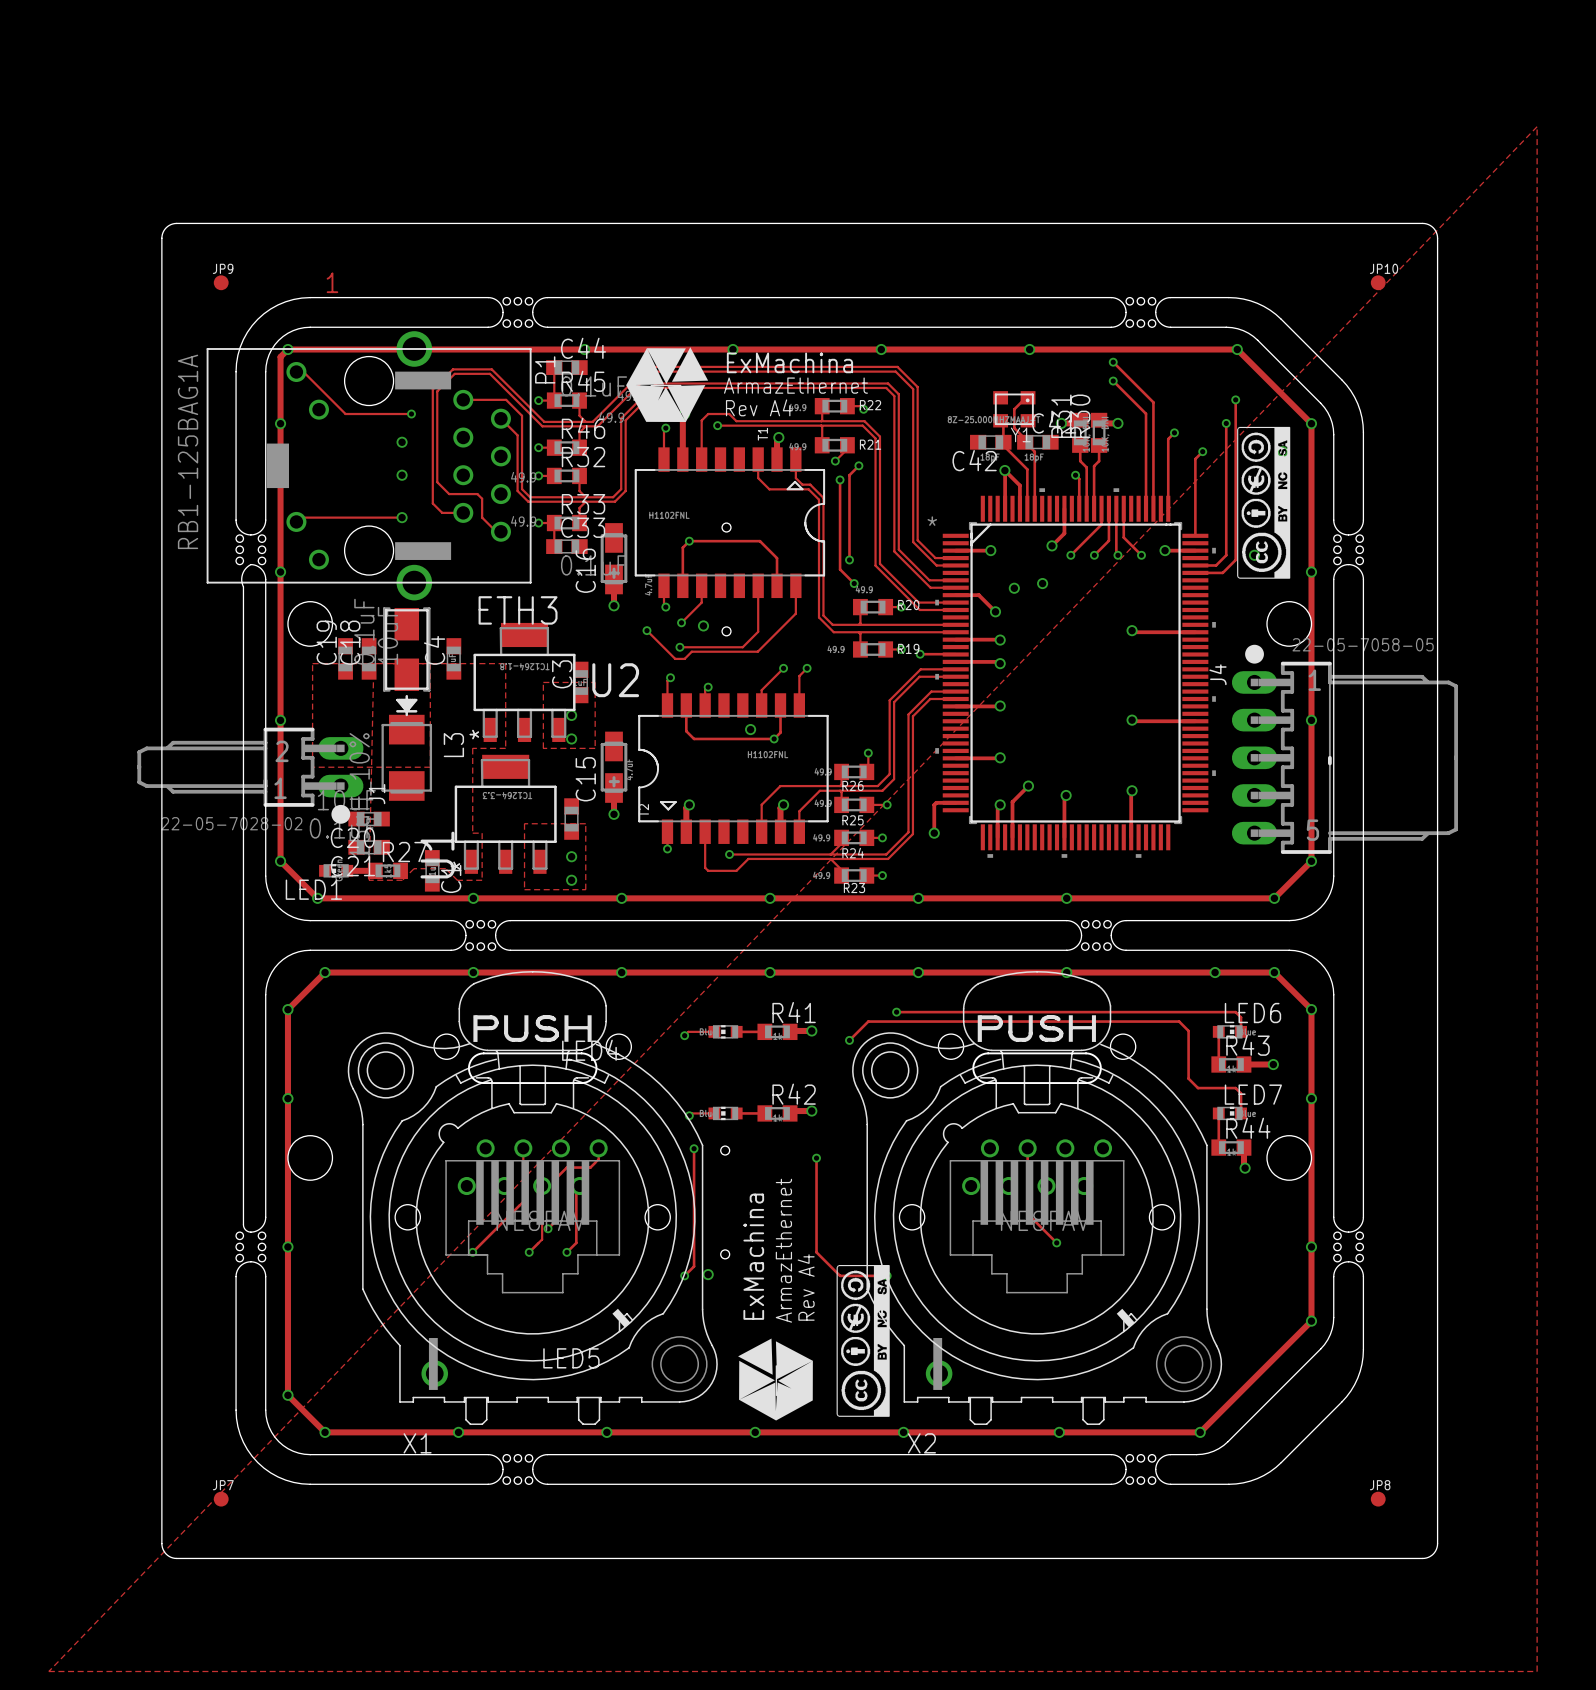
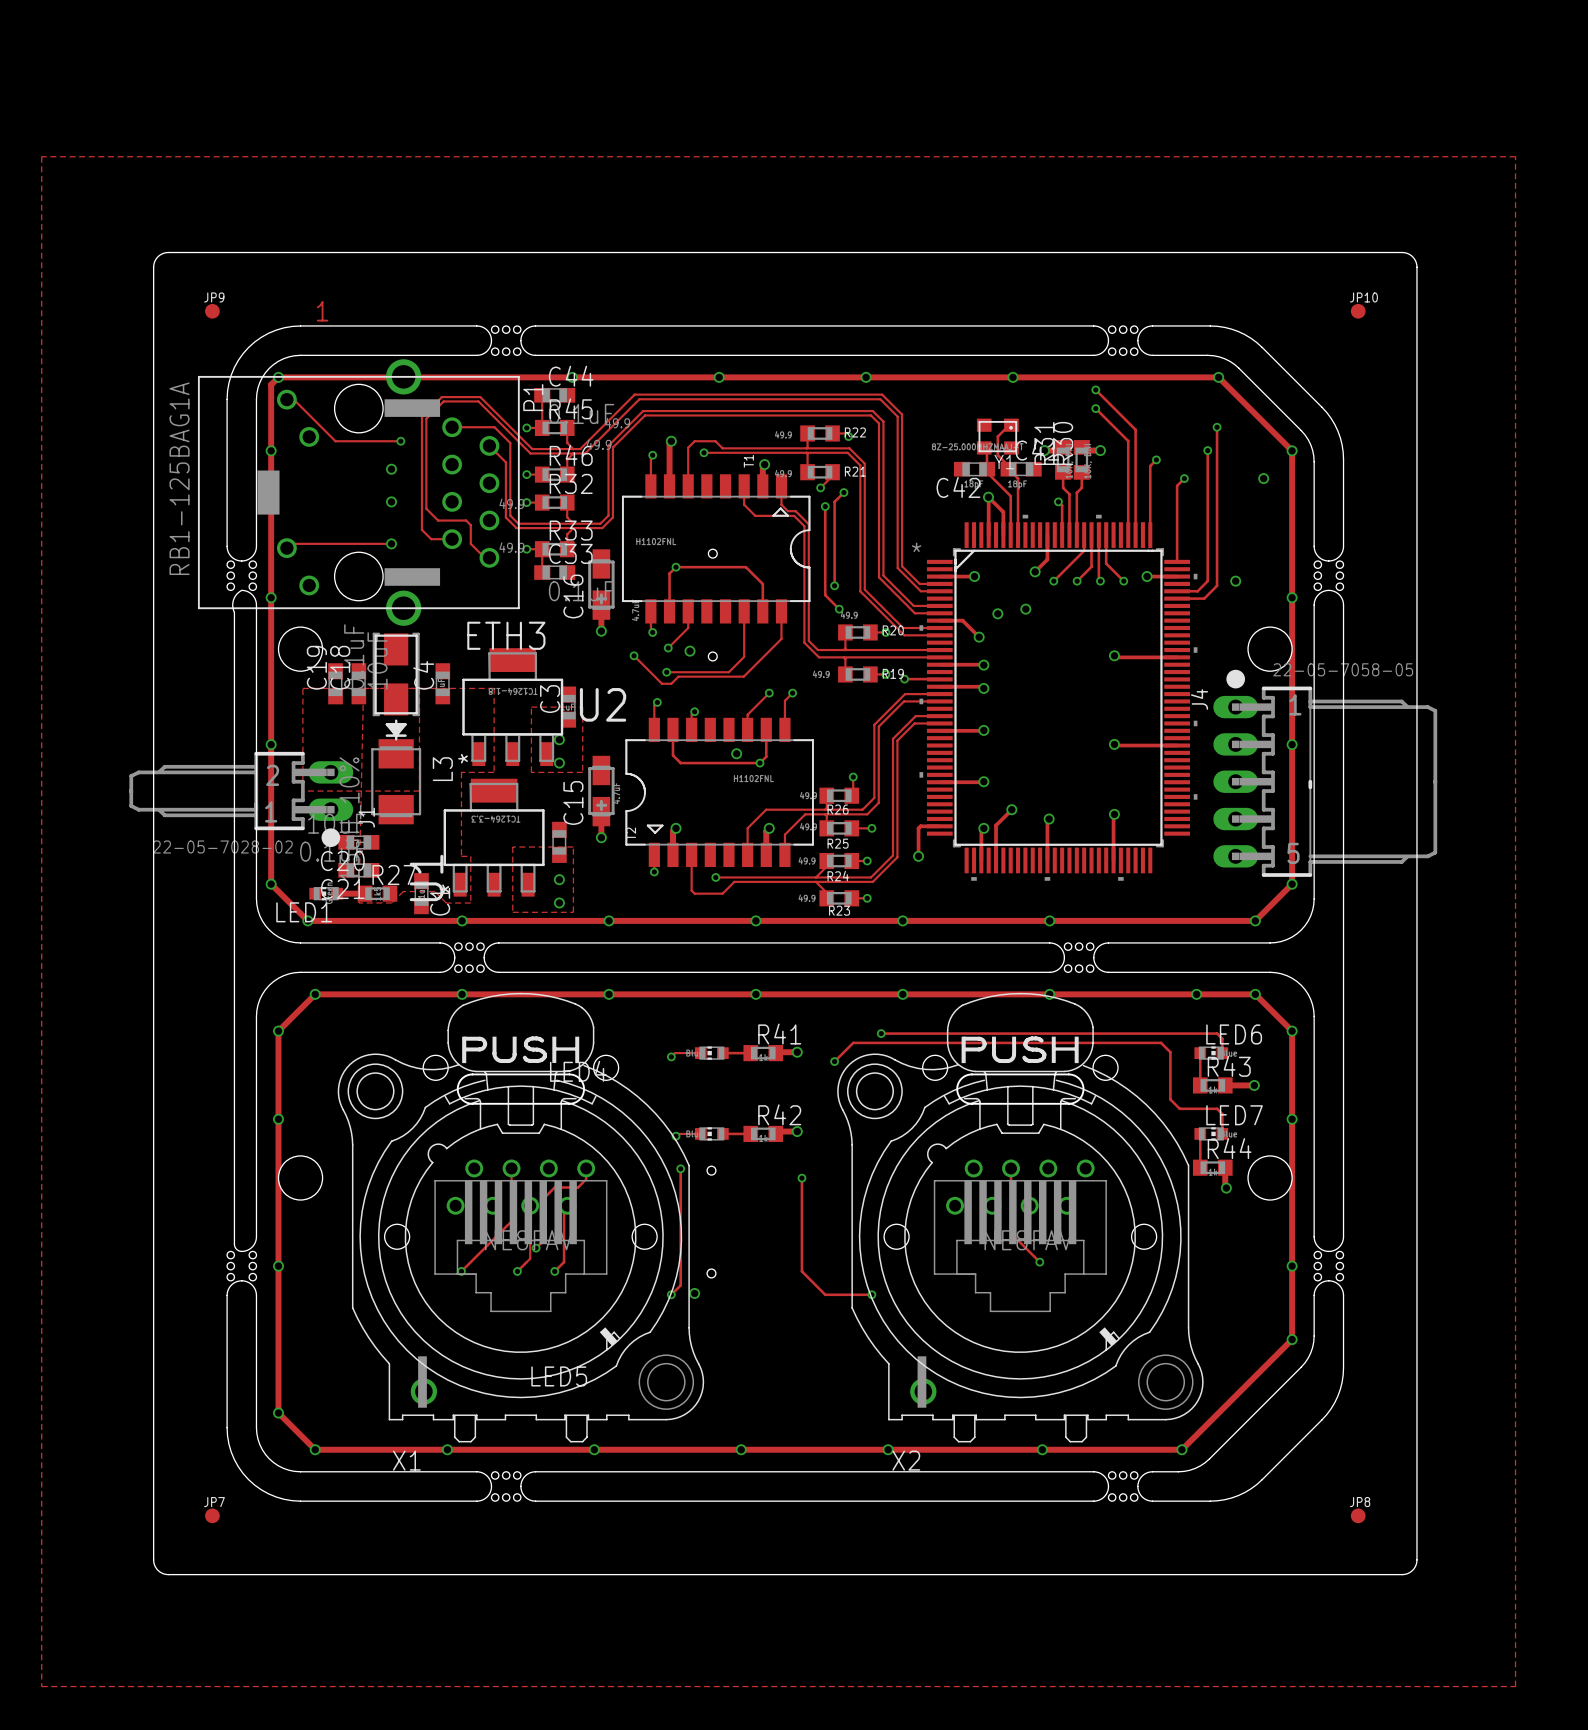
zone outline: (1537, 126) (48, 1671) -> (1515, 156) (41, 156) (41, 1686)
drawing: [626, 347, 709, 423] -> none
text: ArmazEthernet (795, 385) -> none
text: Rev A4 (759, 407) -> none
drawing: [1237, 426, 1291, 579] -> none
text: ArmazEthernet (783, 1250) -> none
drawing: [836, 1265, 890, 1417] -> none
text: Rev A4 (806, 1287) -> none
drawing: [738, 1338, 813, 1421] -> none

